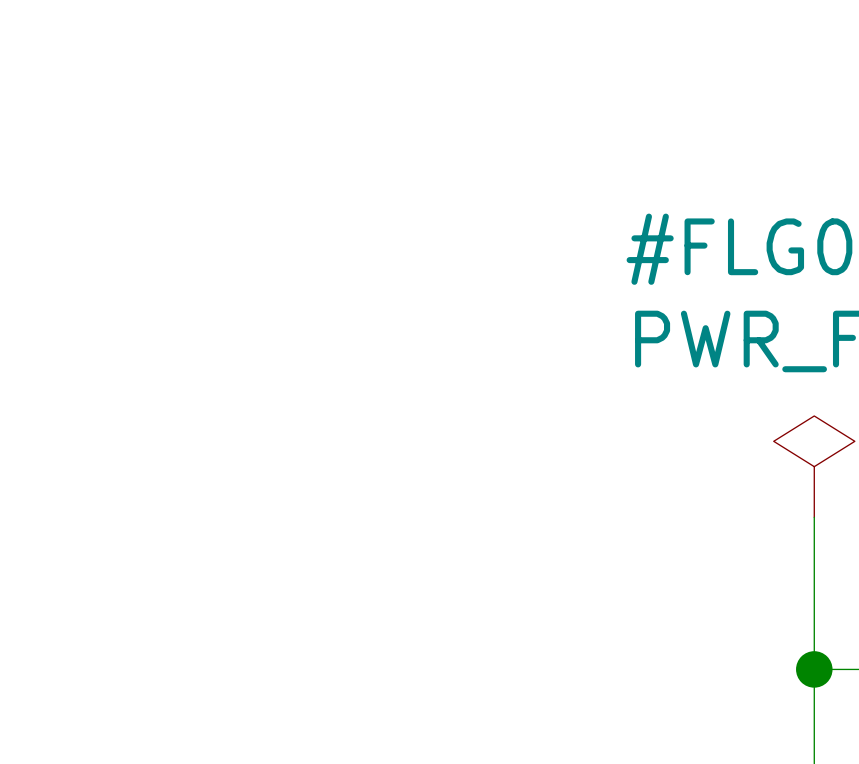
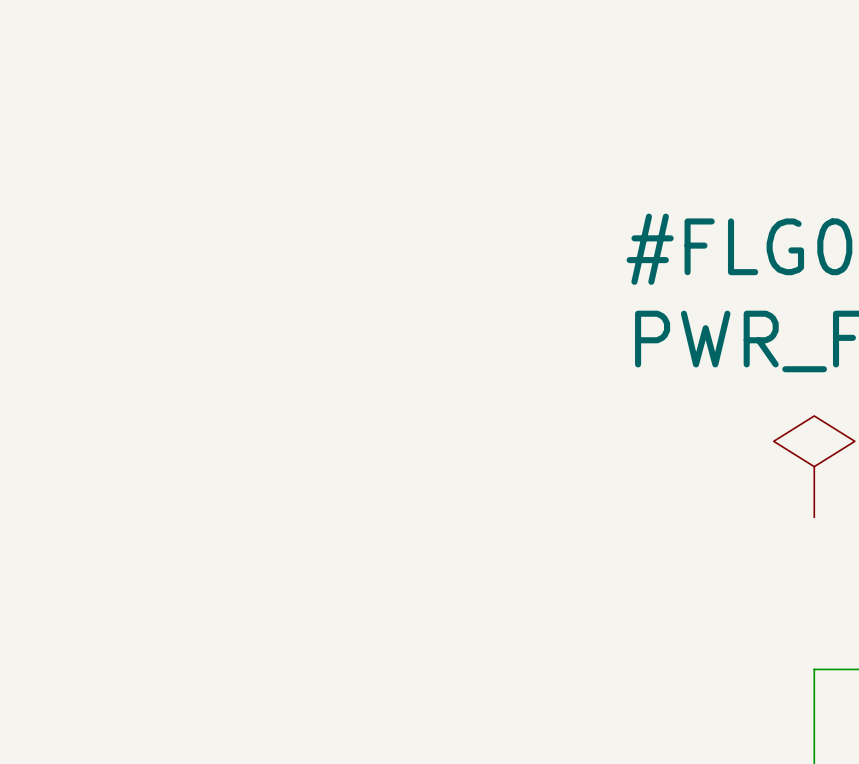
wire: (814, 517) (814, 669) -> none
junction: (814, 669) -> none

